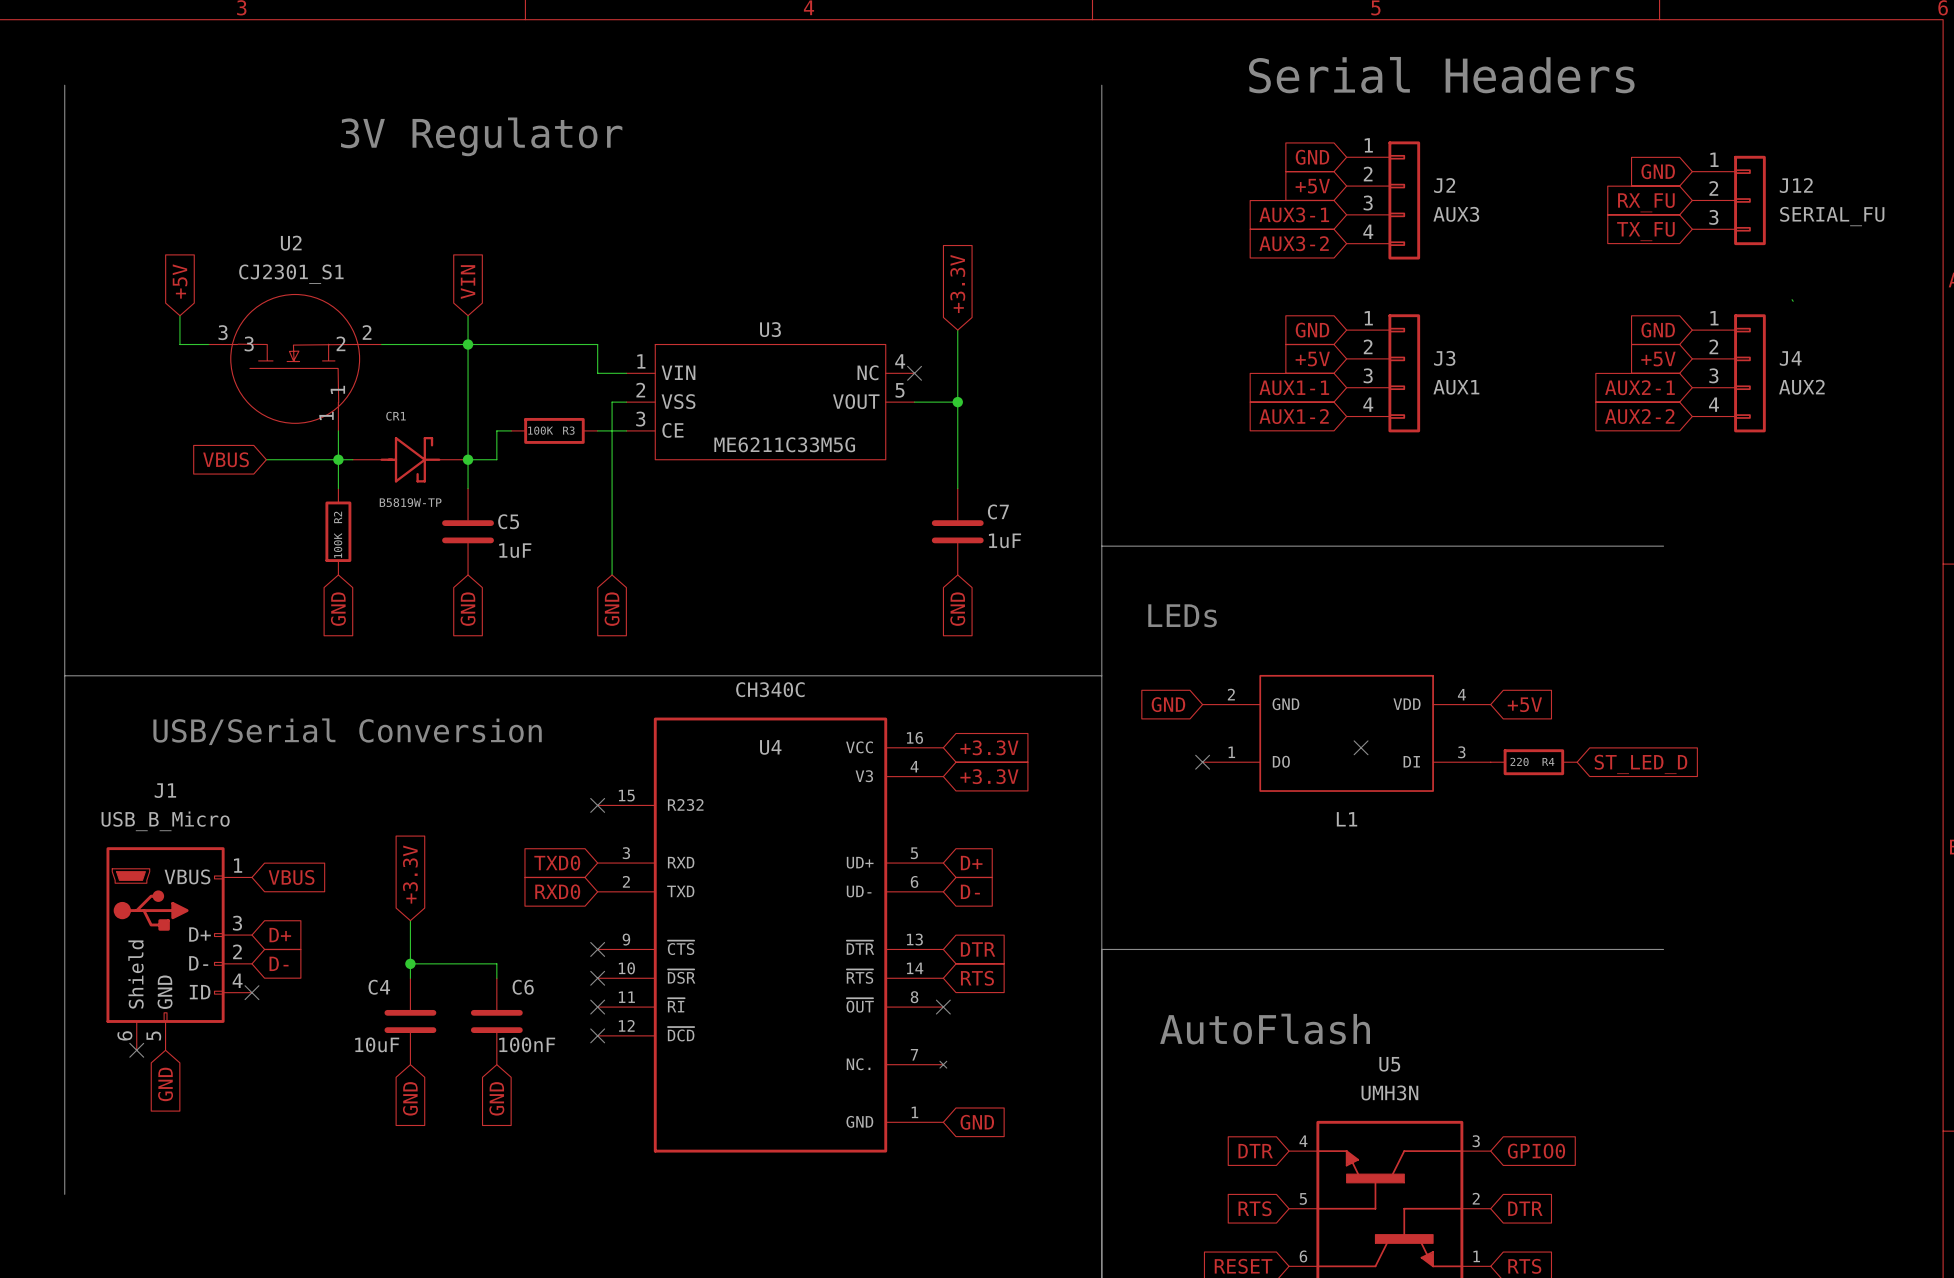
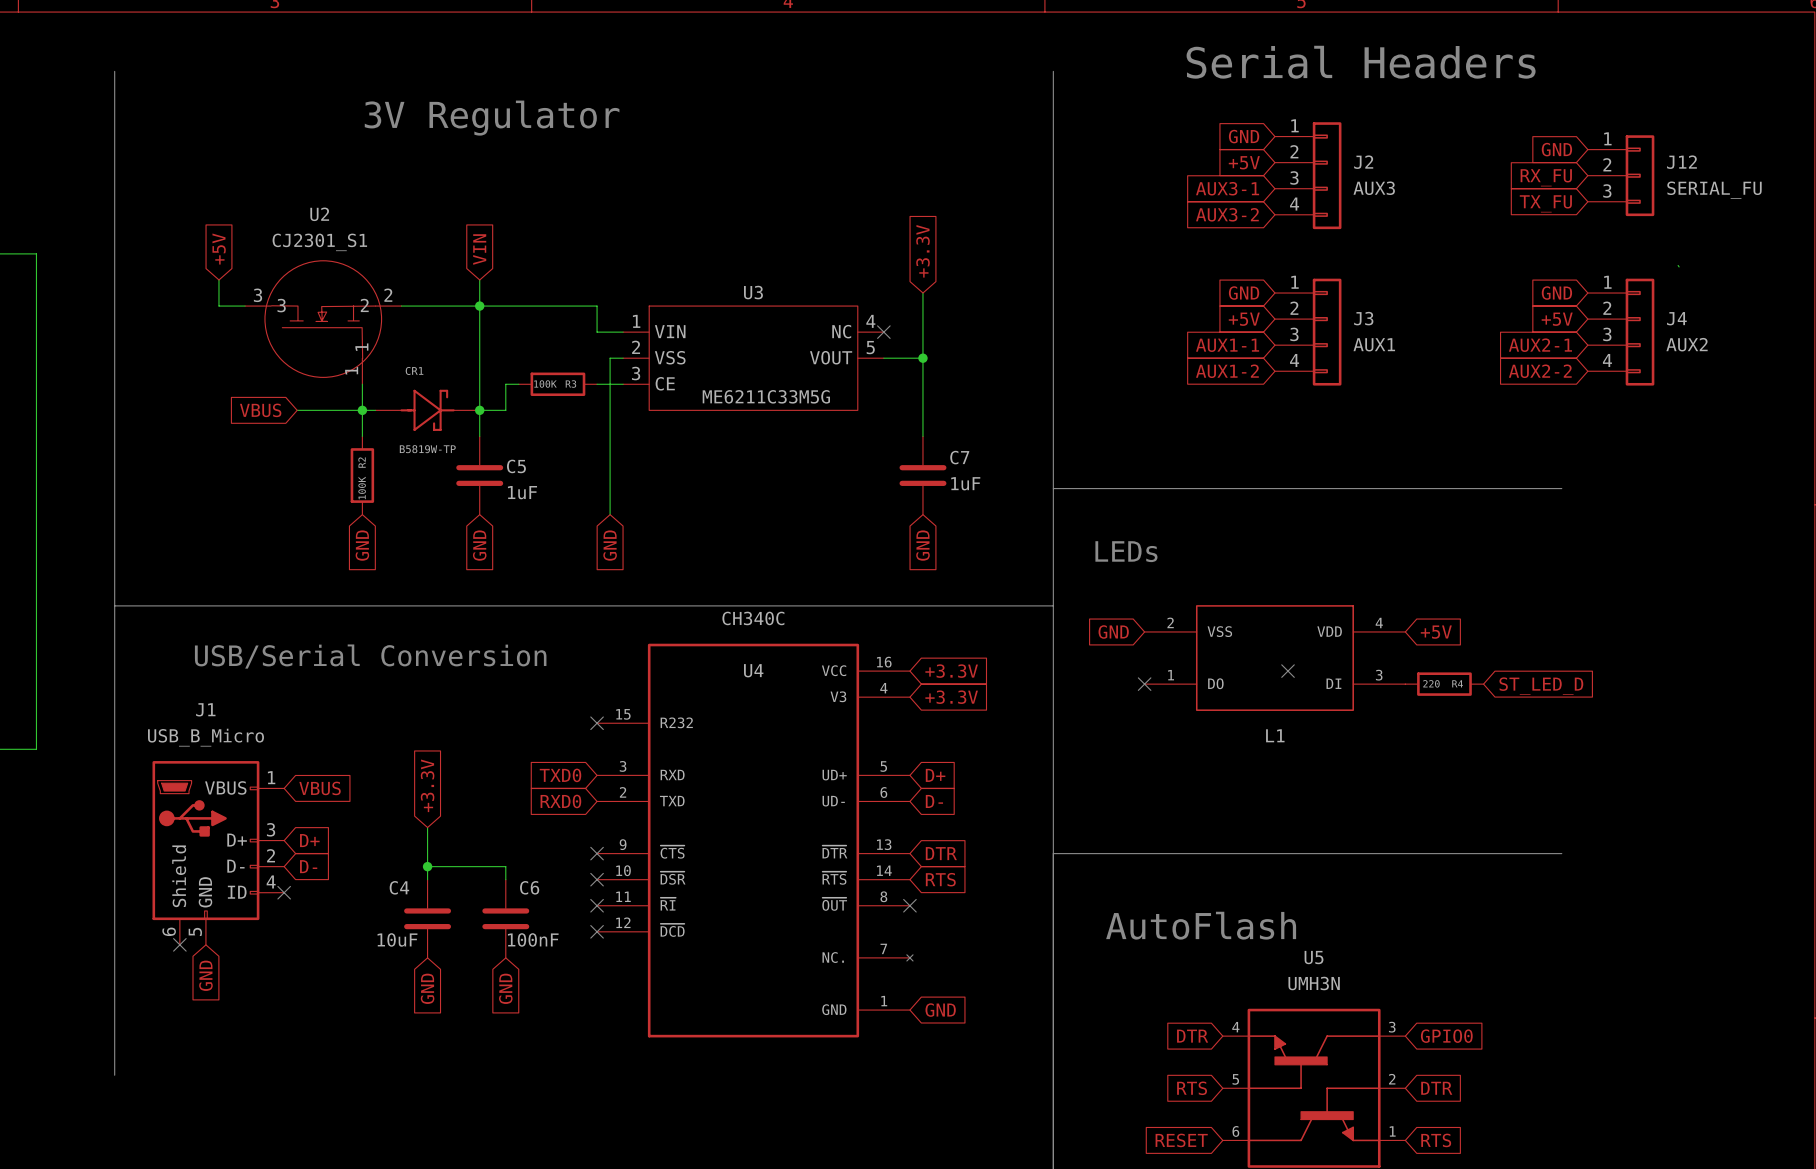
L1 pin name: GND (1285, 704) -> VSS (1219, 631)

